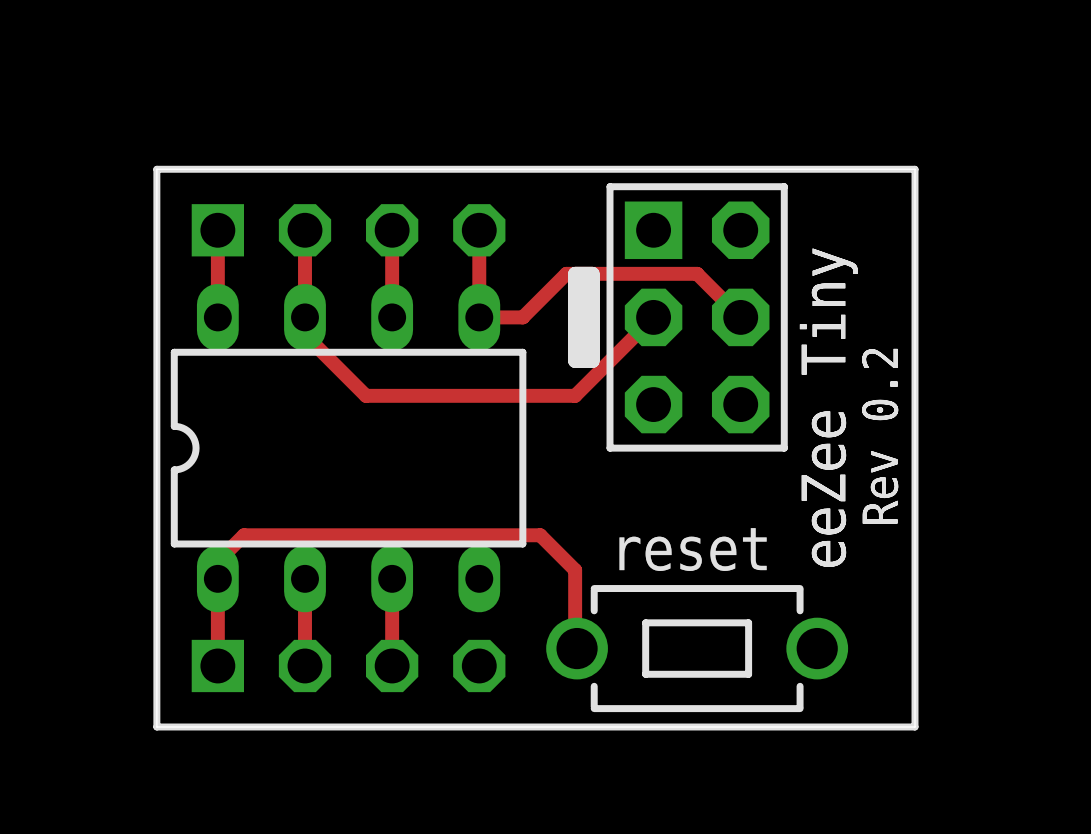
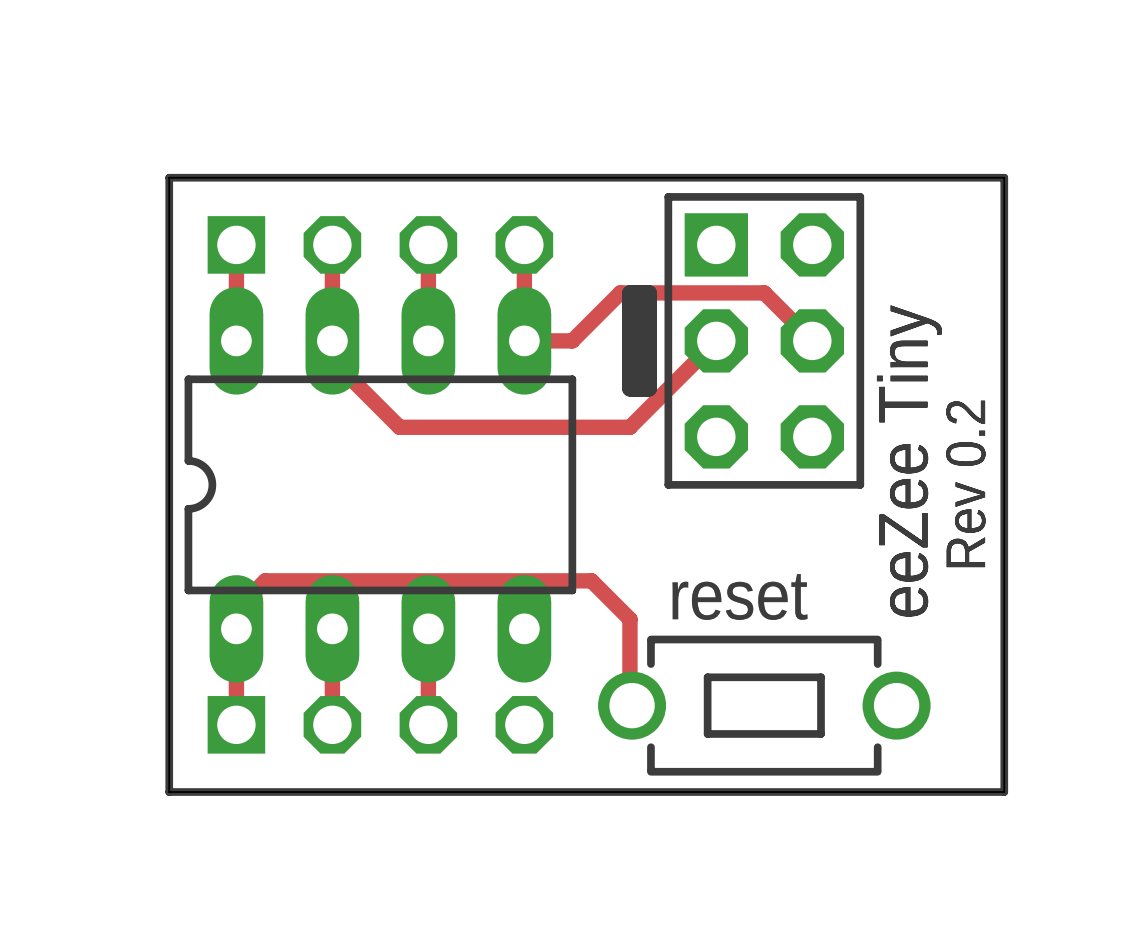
part footprint: [171, 283, 526, 613] -> [185, 287, 576, 683]

